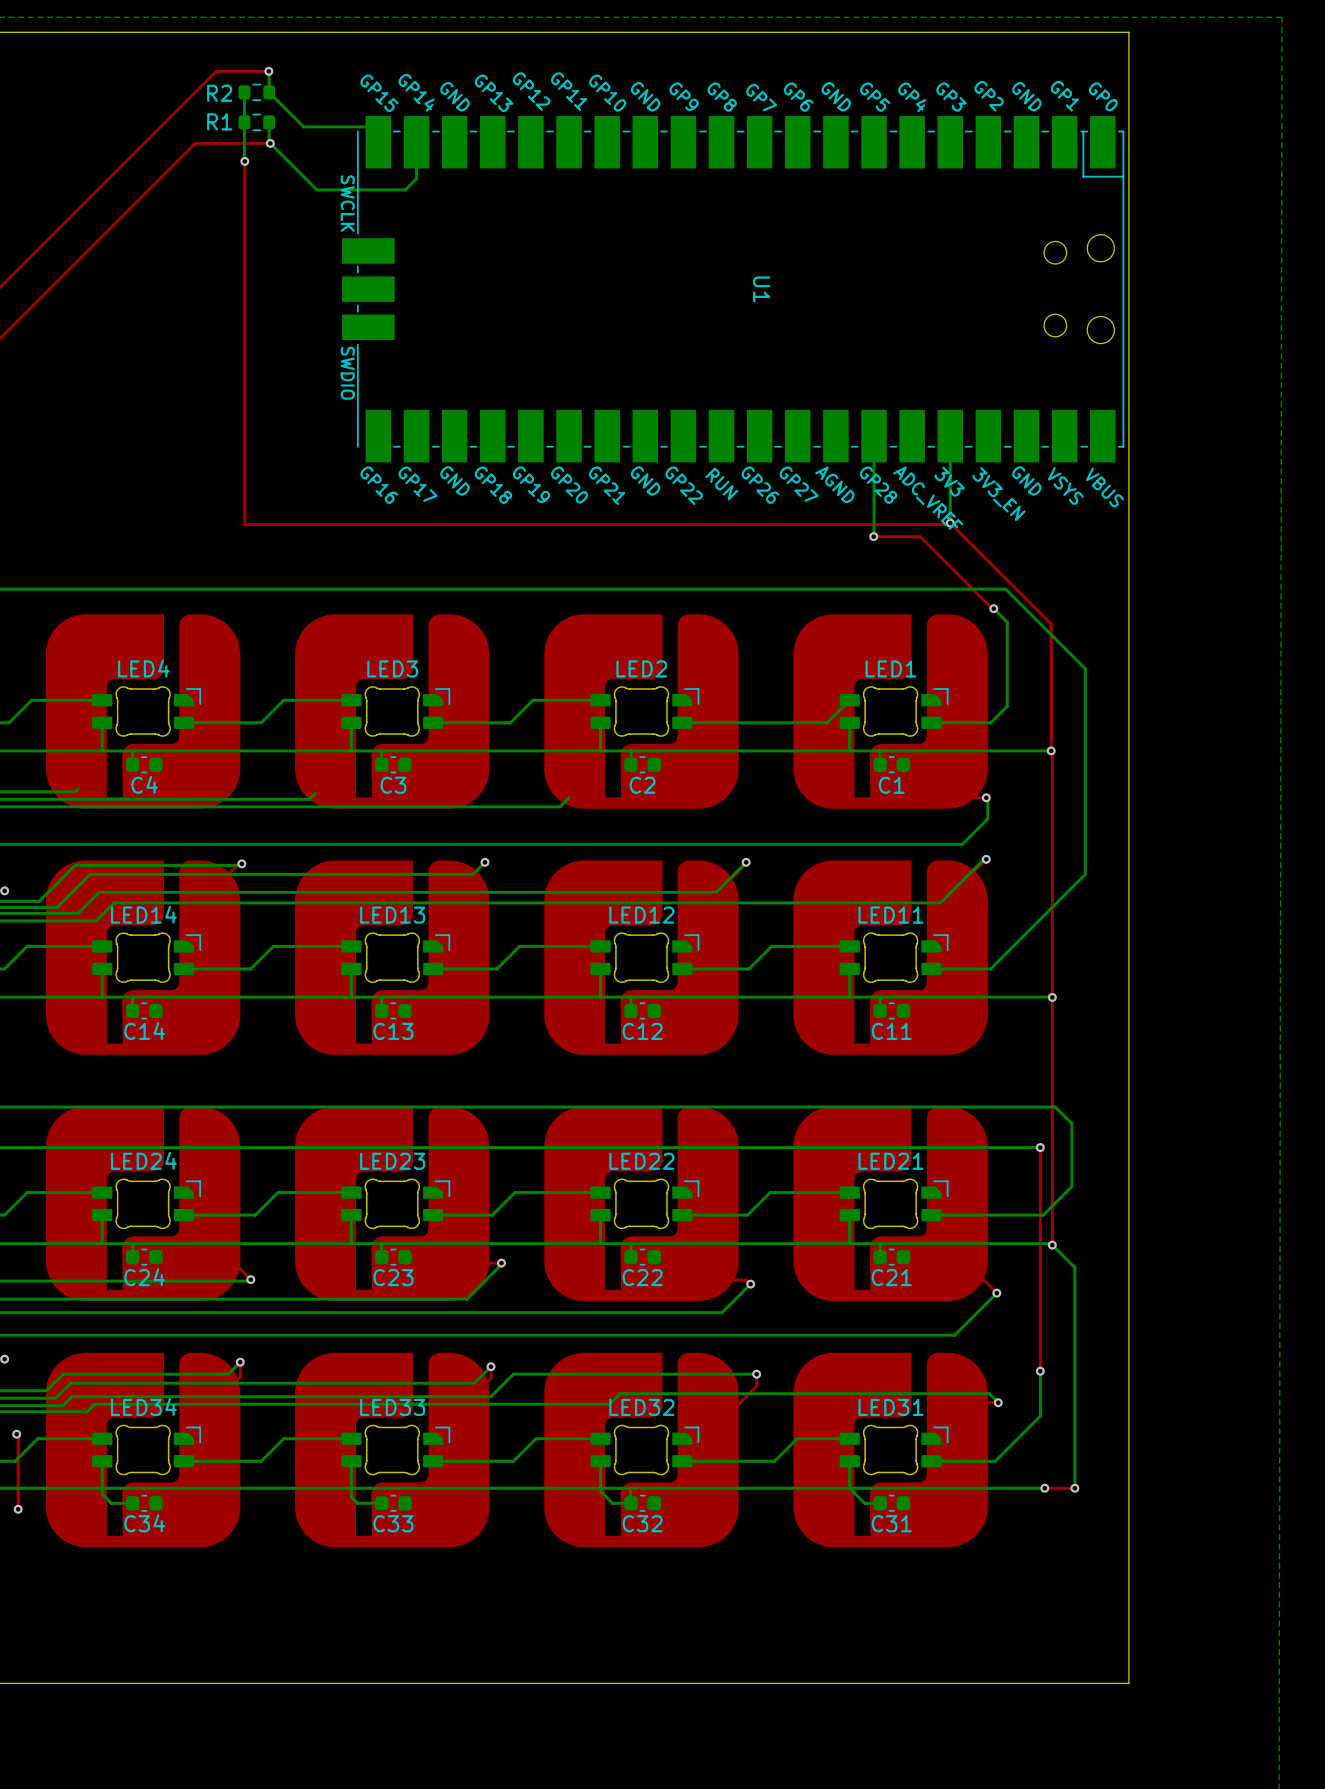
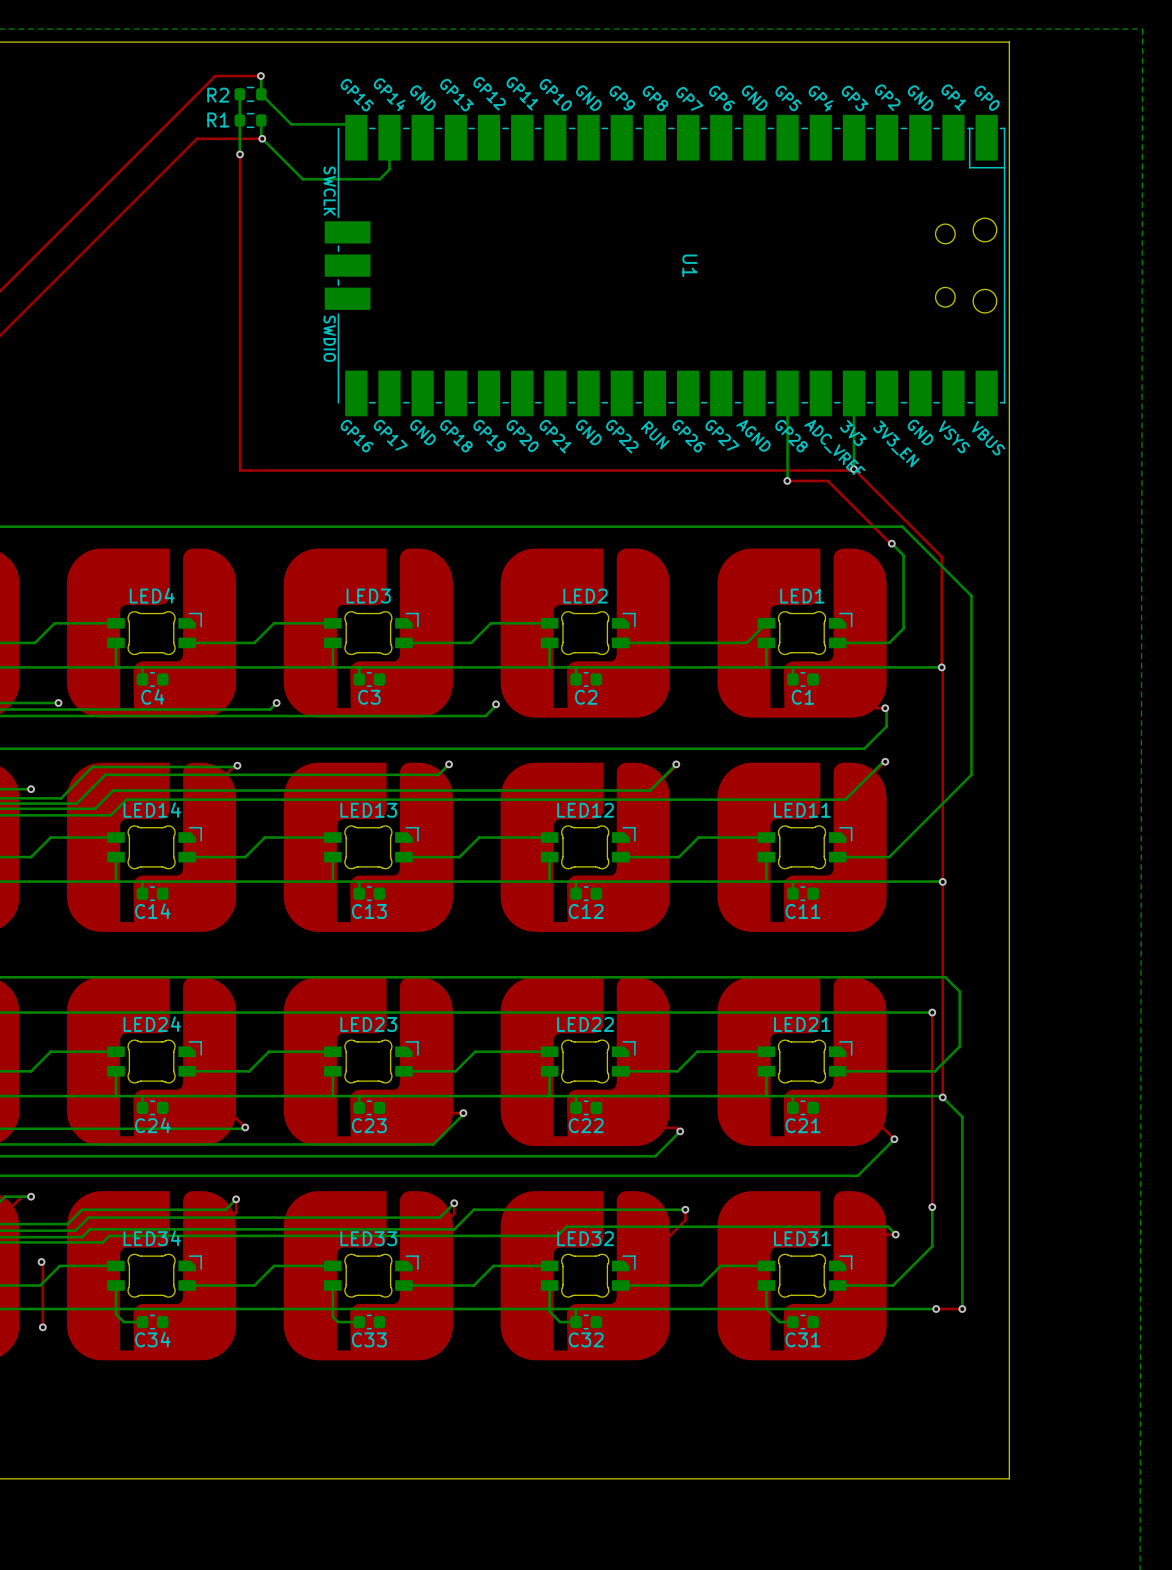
bottom track: (78, 788) (75, 791) (36, 791) -> none
via: none -> (58, 702)
via: none -> (276, 702)
bottom track: (315, 793) (309, 799) (279, 799) -> (276, 702) (270, 709)
via: none -> (496, 704)
bottom track: (569, 797) (560, 806) (527, 806) -> (496, 704) (485, 716)

